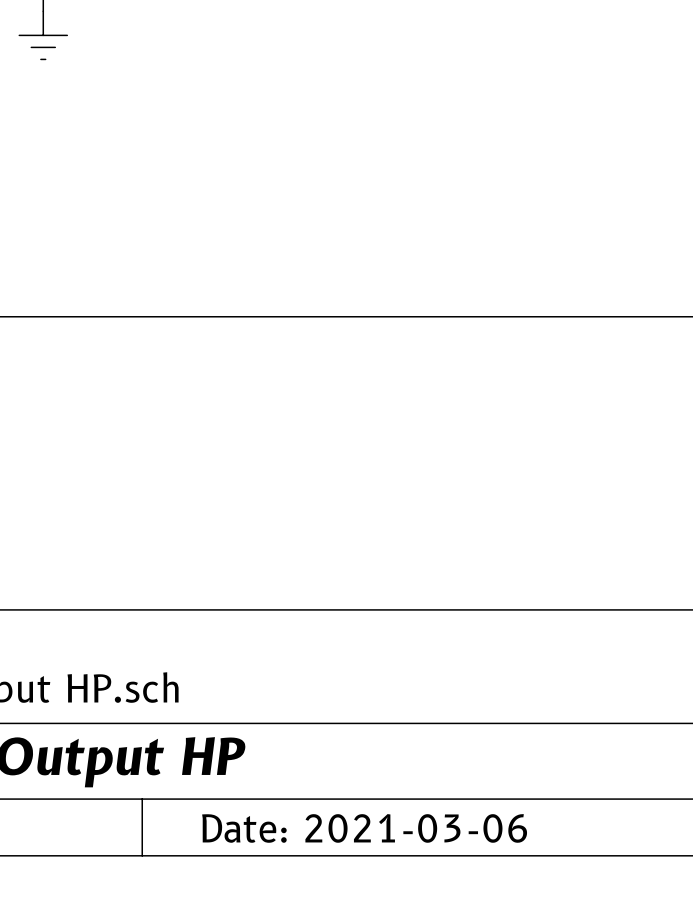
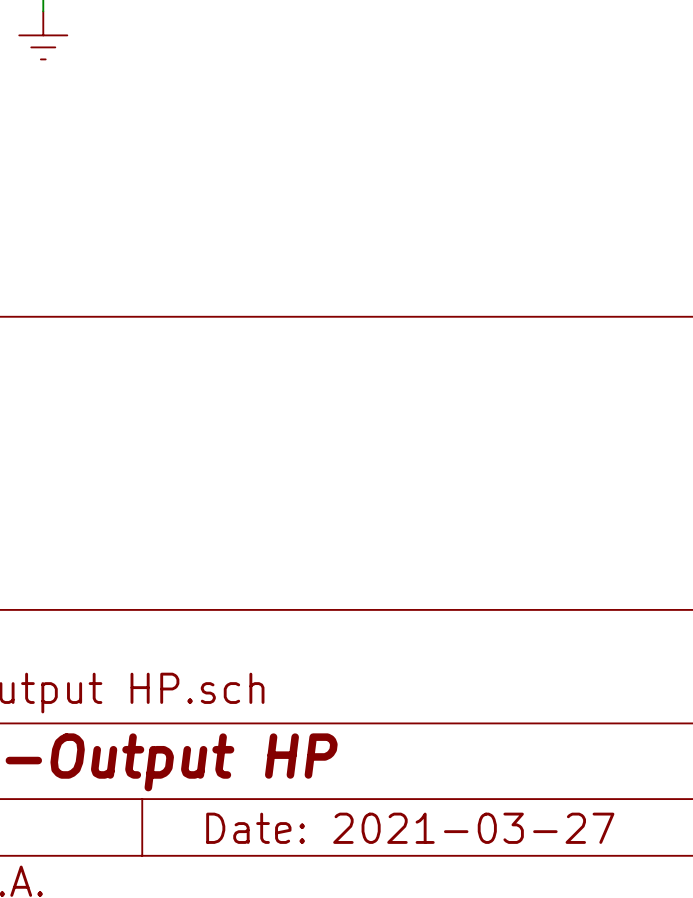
title block: Date: 2021-03-06 (364, 828) -> Date: 2021-03-27 (410, 828)

